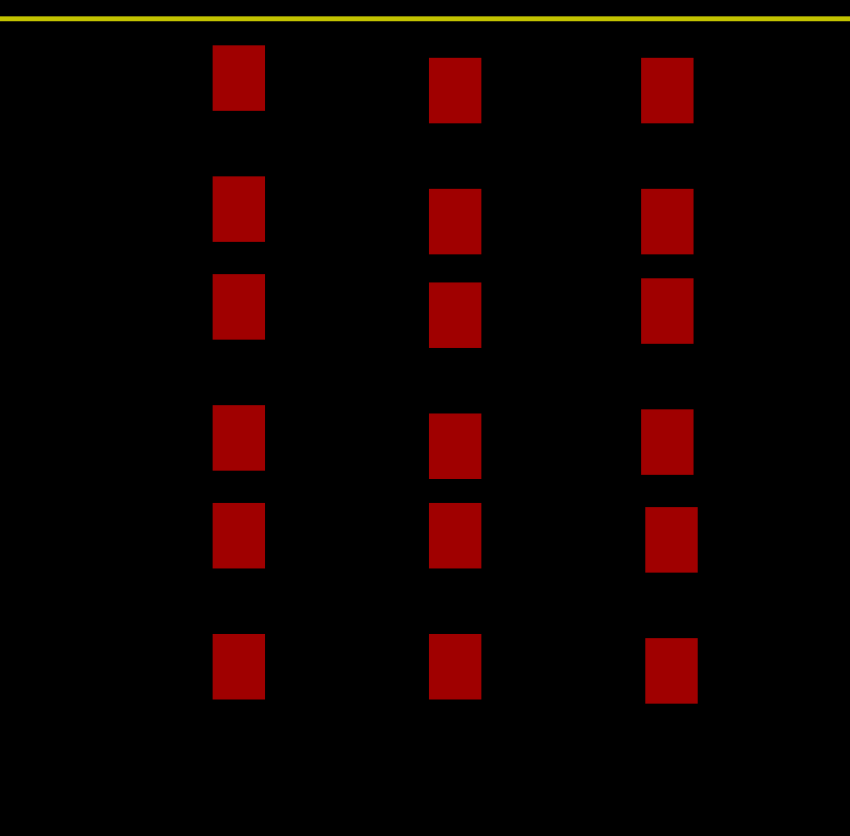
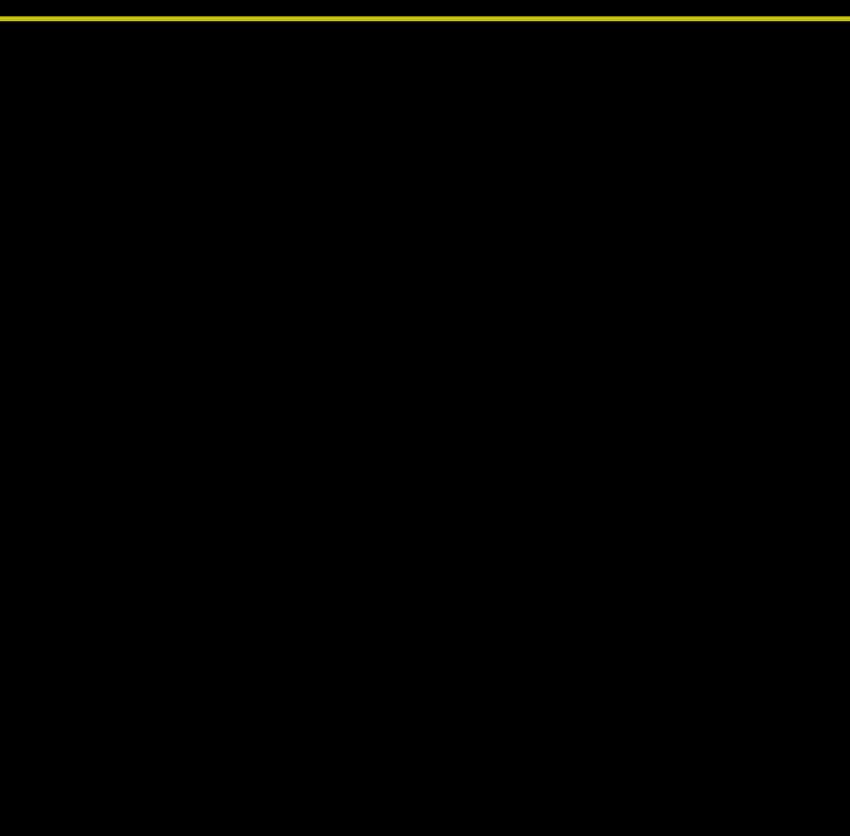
part: (238, 143) -> none
part: (455, 156) -> none
part: (667, 156) -> none
part: (238, 372) -> none
part: (667, 376) -> none
part: (455, 380) -> none
part: (238, 601) -> none
part: (455, 601) -> none
part: (671, 605) -> none

